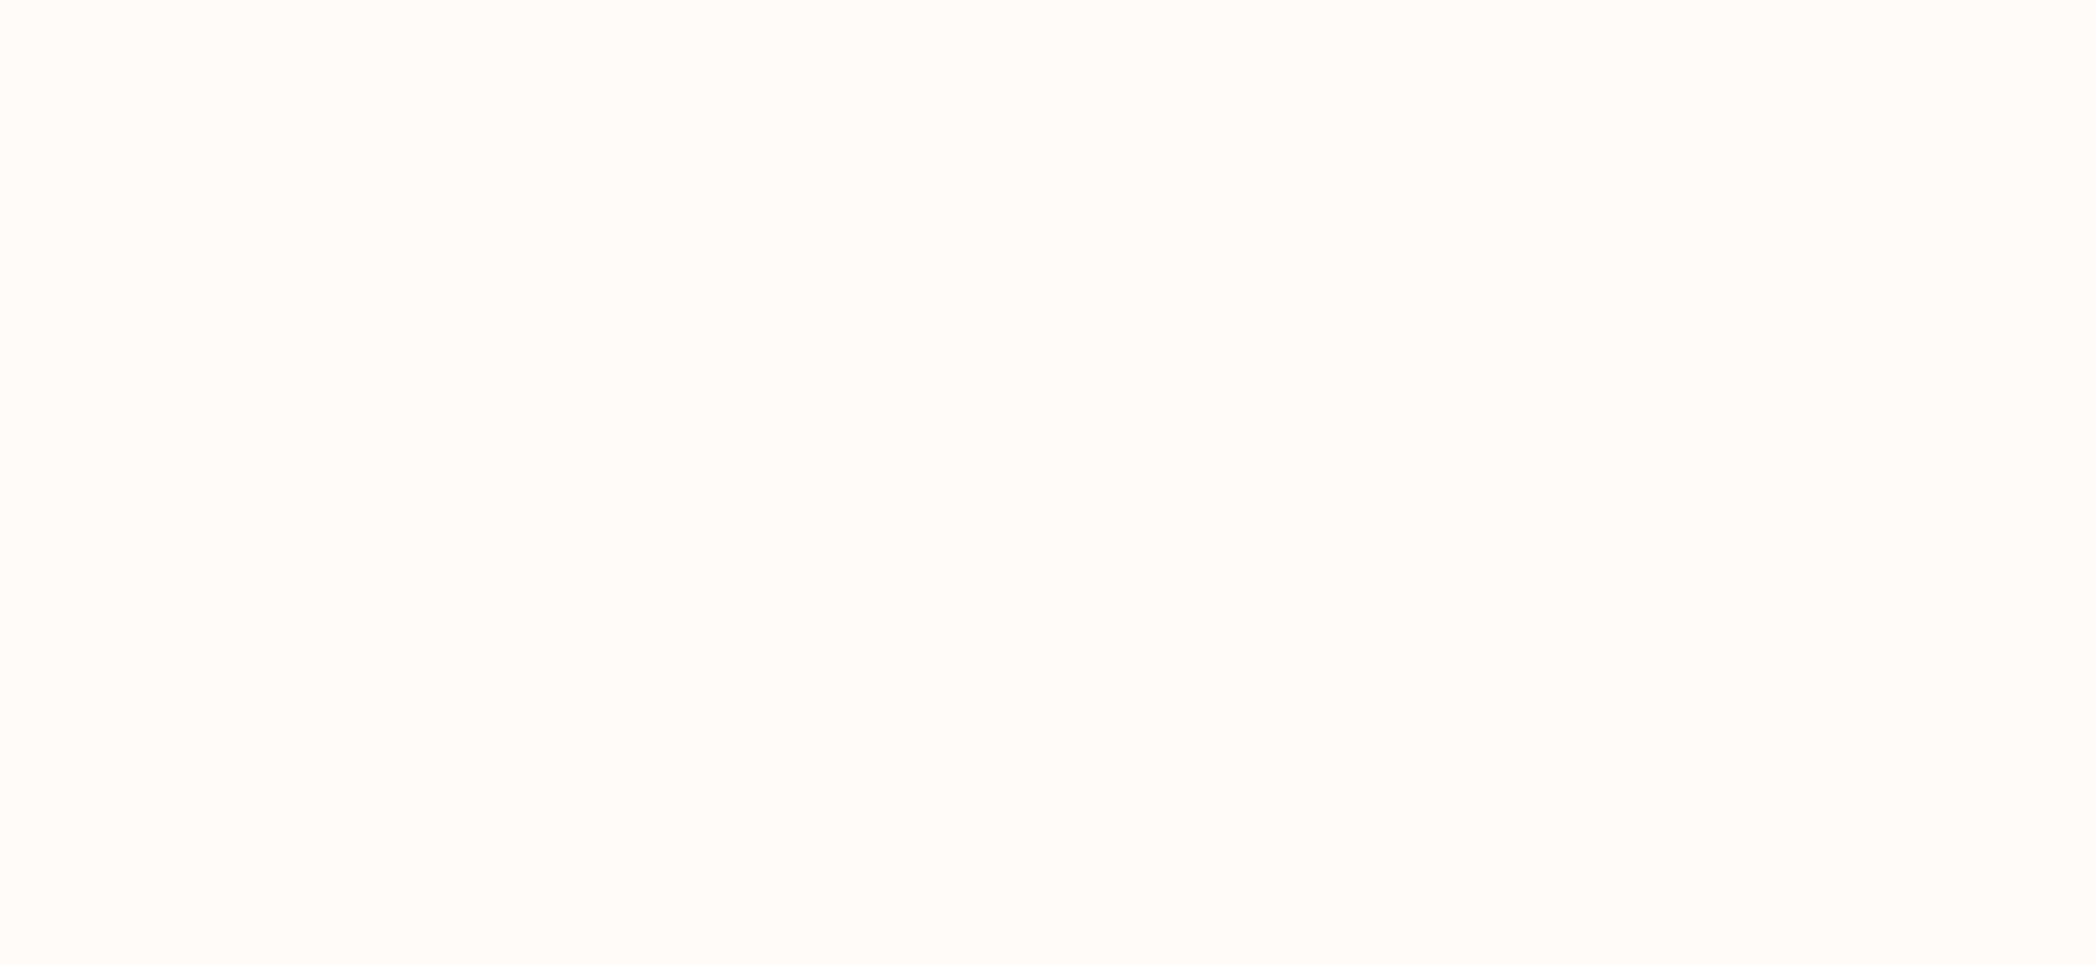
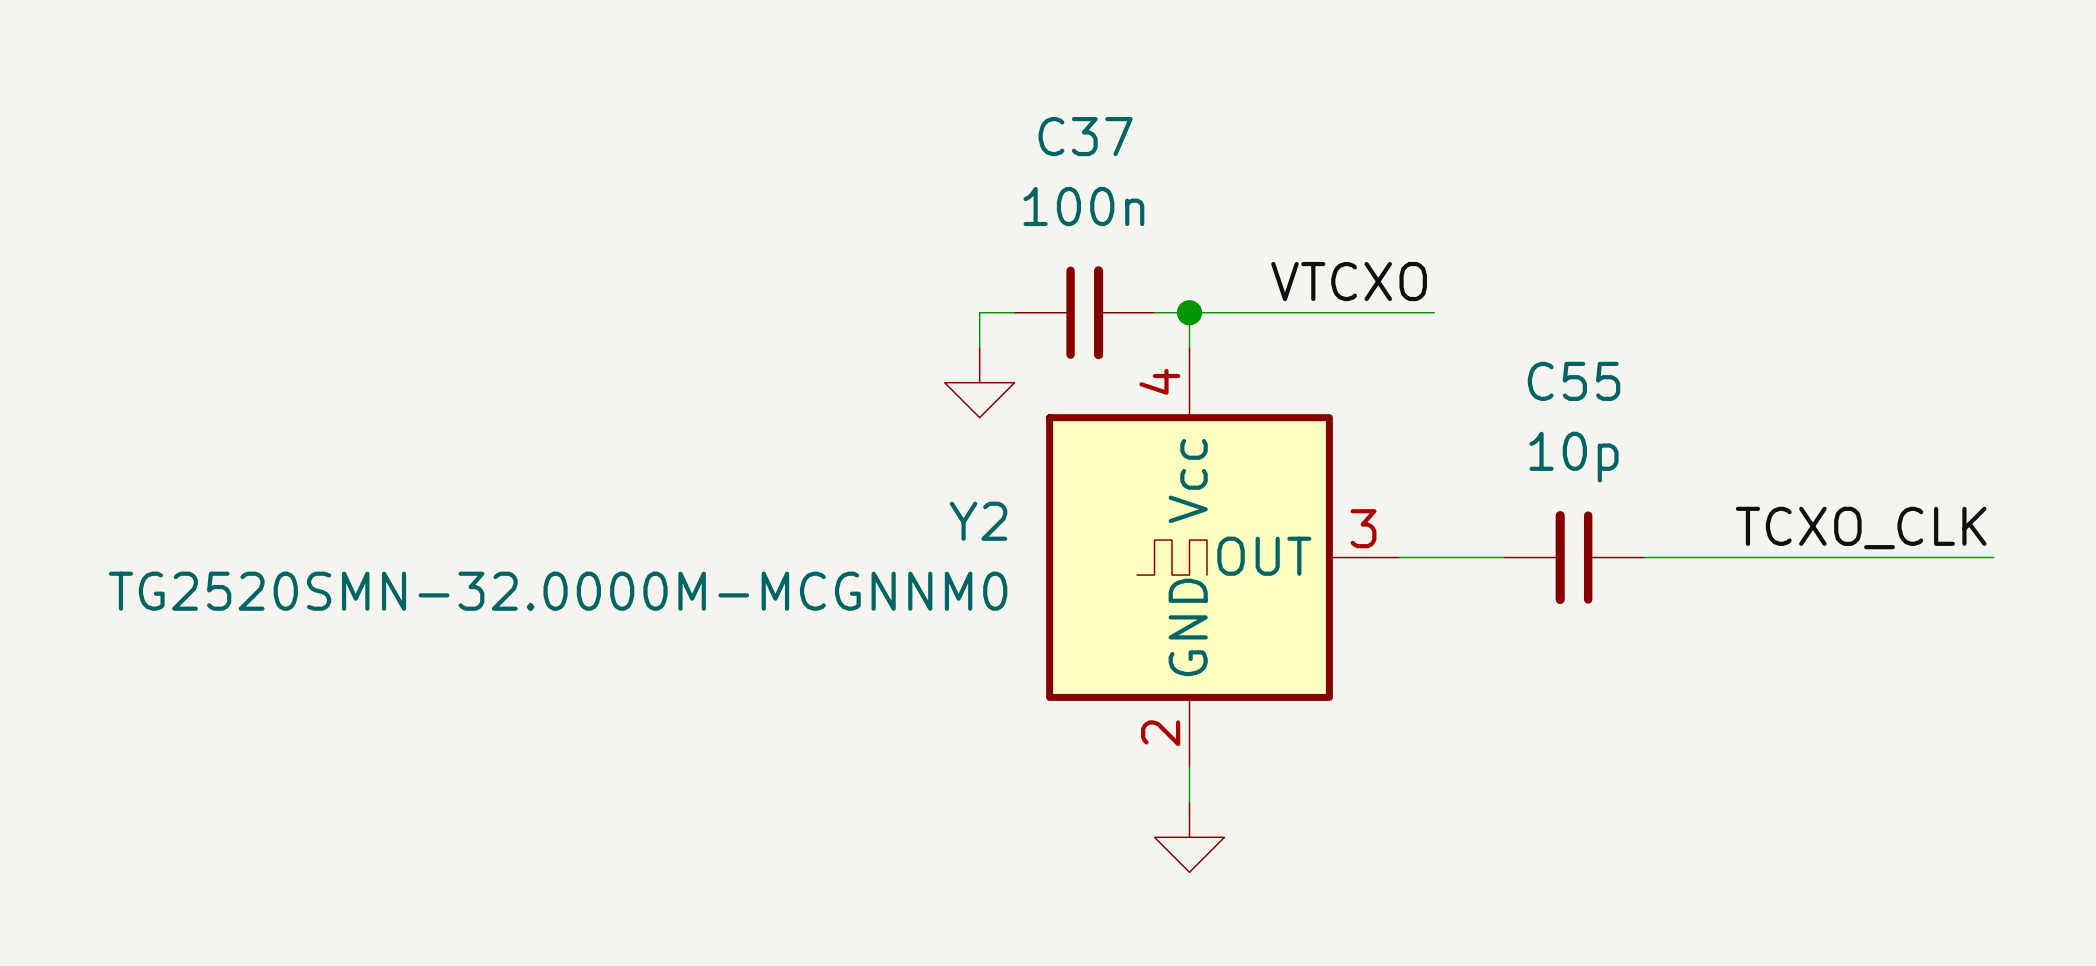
label: none -> VTCXO (1349, 281)
wire: none -> (1014, 312) (979, 312) (979, 347)
C37: none -> 100n (1084, 312)
wire: none -> (1154, 312) (1434, 312)
wire: none -> (1189, 312) (1189, 347)
junction: none -> (1189, 312)
power symbol: none -> (979, 382)
label: none -> TCXO_CLK (1861, 528)
Y2: none -> TG2520SMN-32.0000M-MCGNNM0 (1222, 557)
wire: none -> (1399, 557) (1504, 557)
C55: none -> 10p (1574, 557)
wire: none -> (1644, 557) (1993, 557)
wire: none -> (1189, 767) (1189, 802)
power symbol: none -> (1189, 837)

